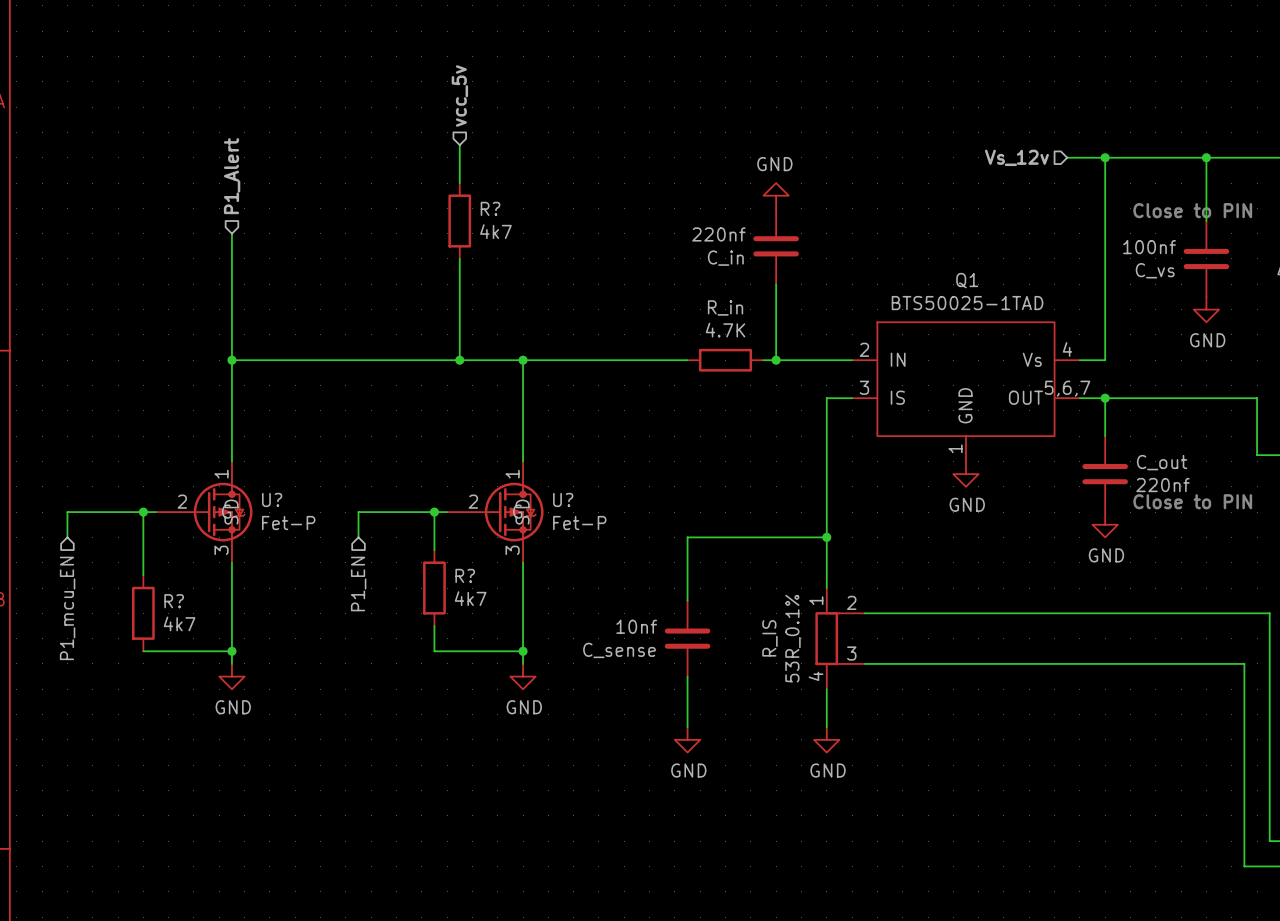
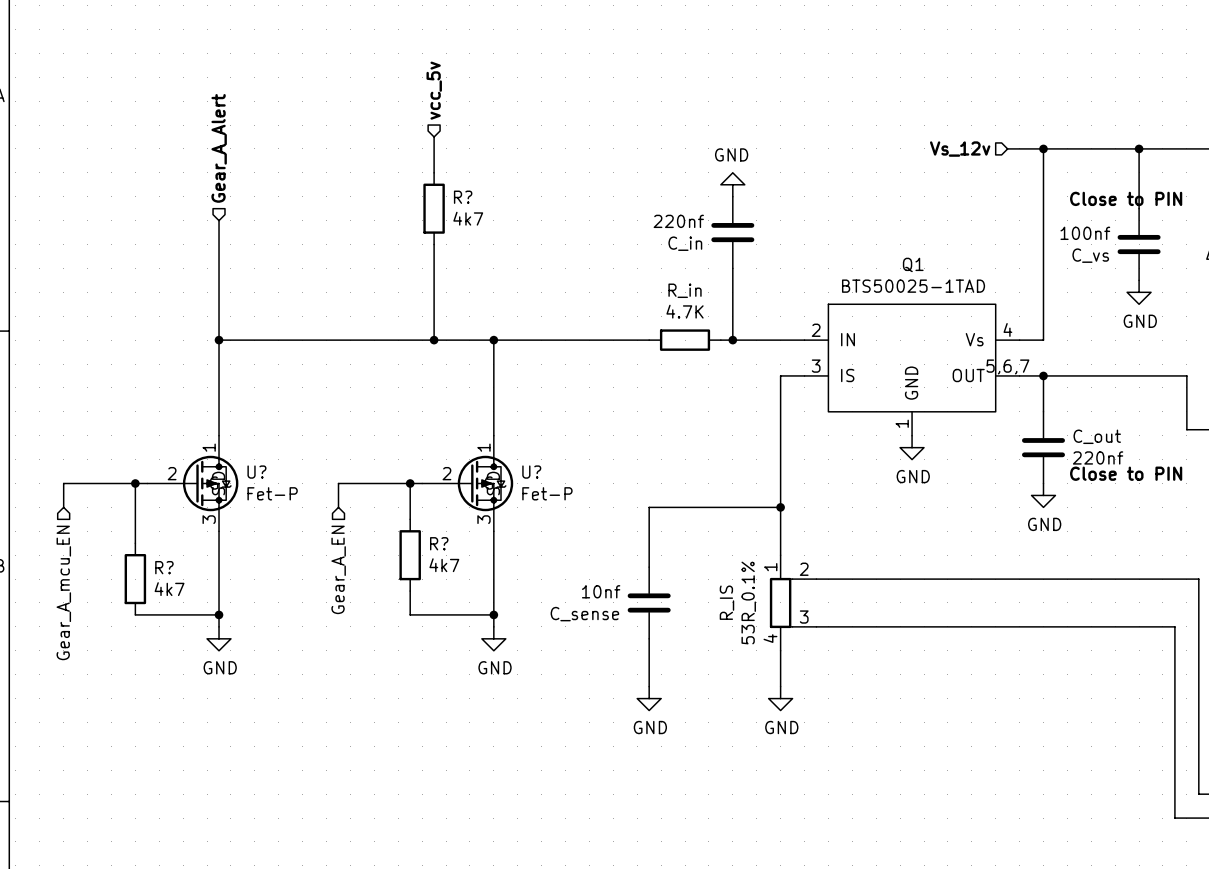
hierarchical label: P1_Alert (232, 176) -> Gear_A_Alert (219, 148)
hierarchical label: P1_EN (358, 584) -> Gear_A_EN (338, 569)
hierarchical label: P1_mcu_EN (67, 608) -> Gear_A_mcu_EN (63, 592)

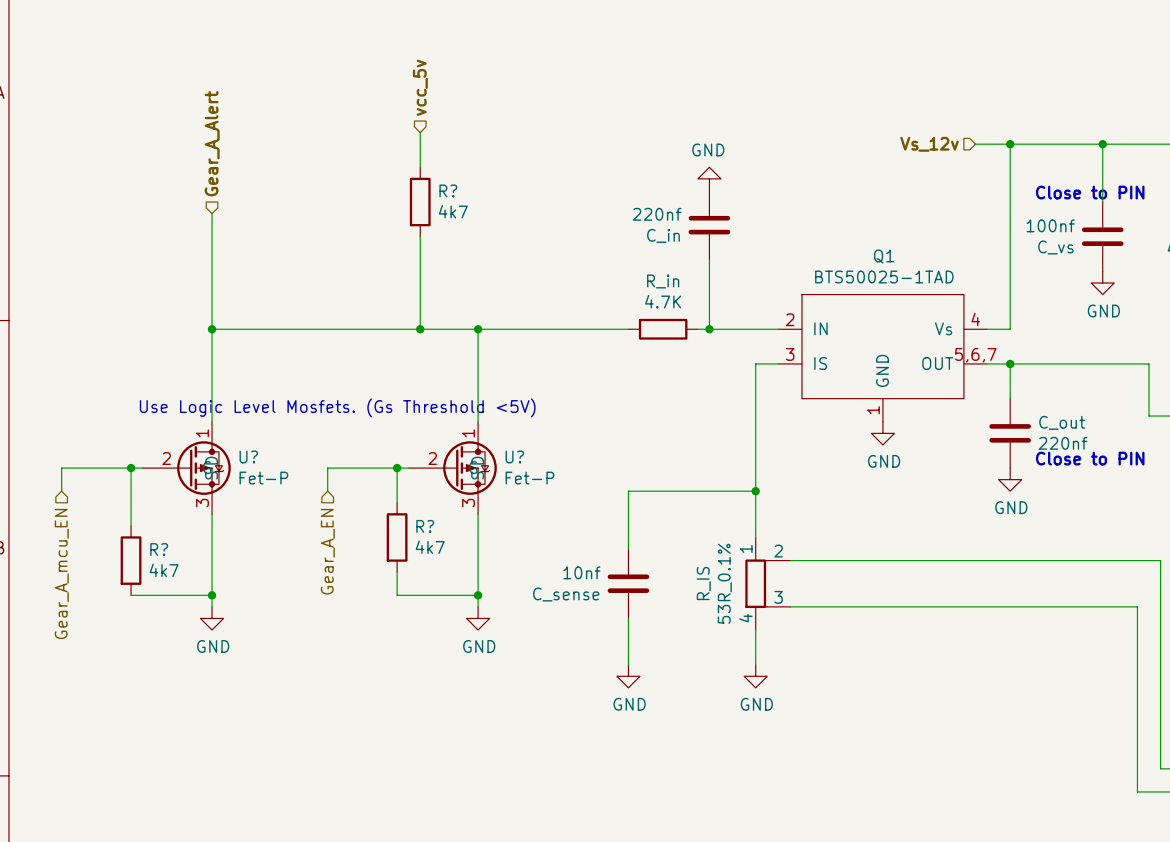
text: none -> Use Logic Level Mosfets. (Gs Threshold <5V) (337, 407)

